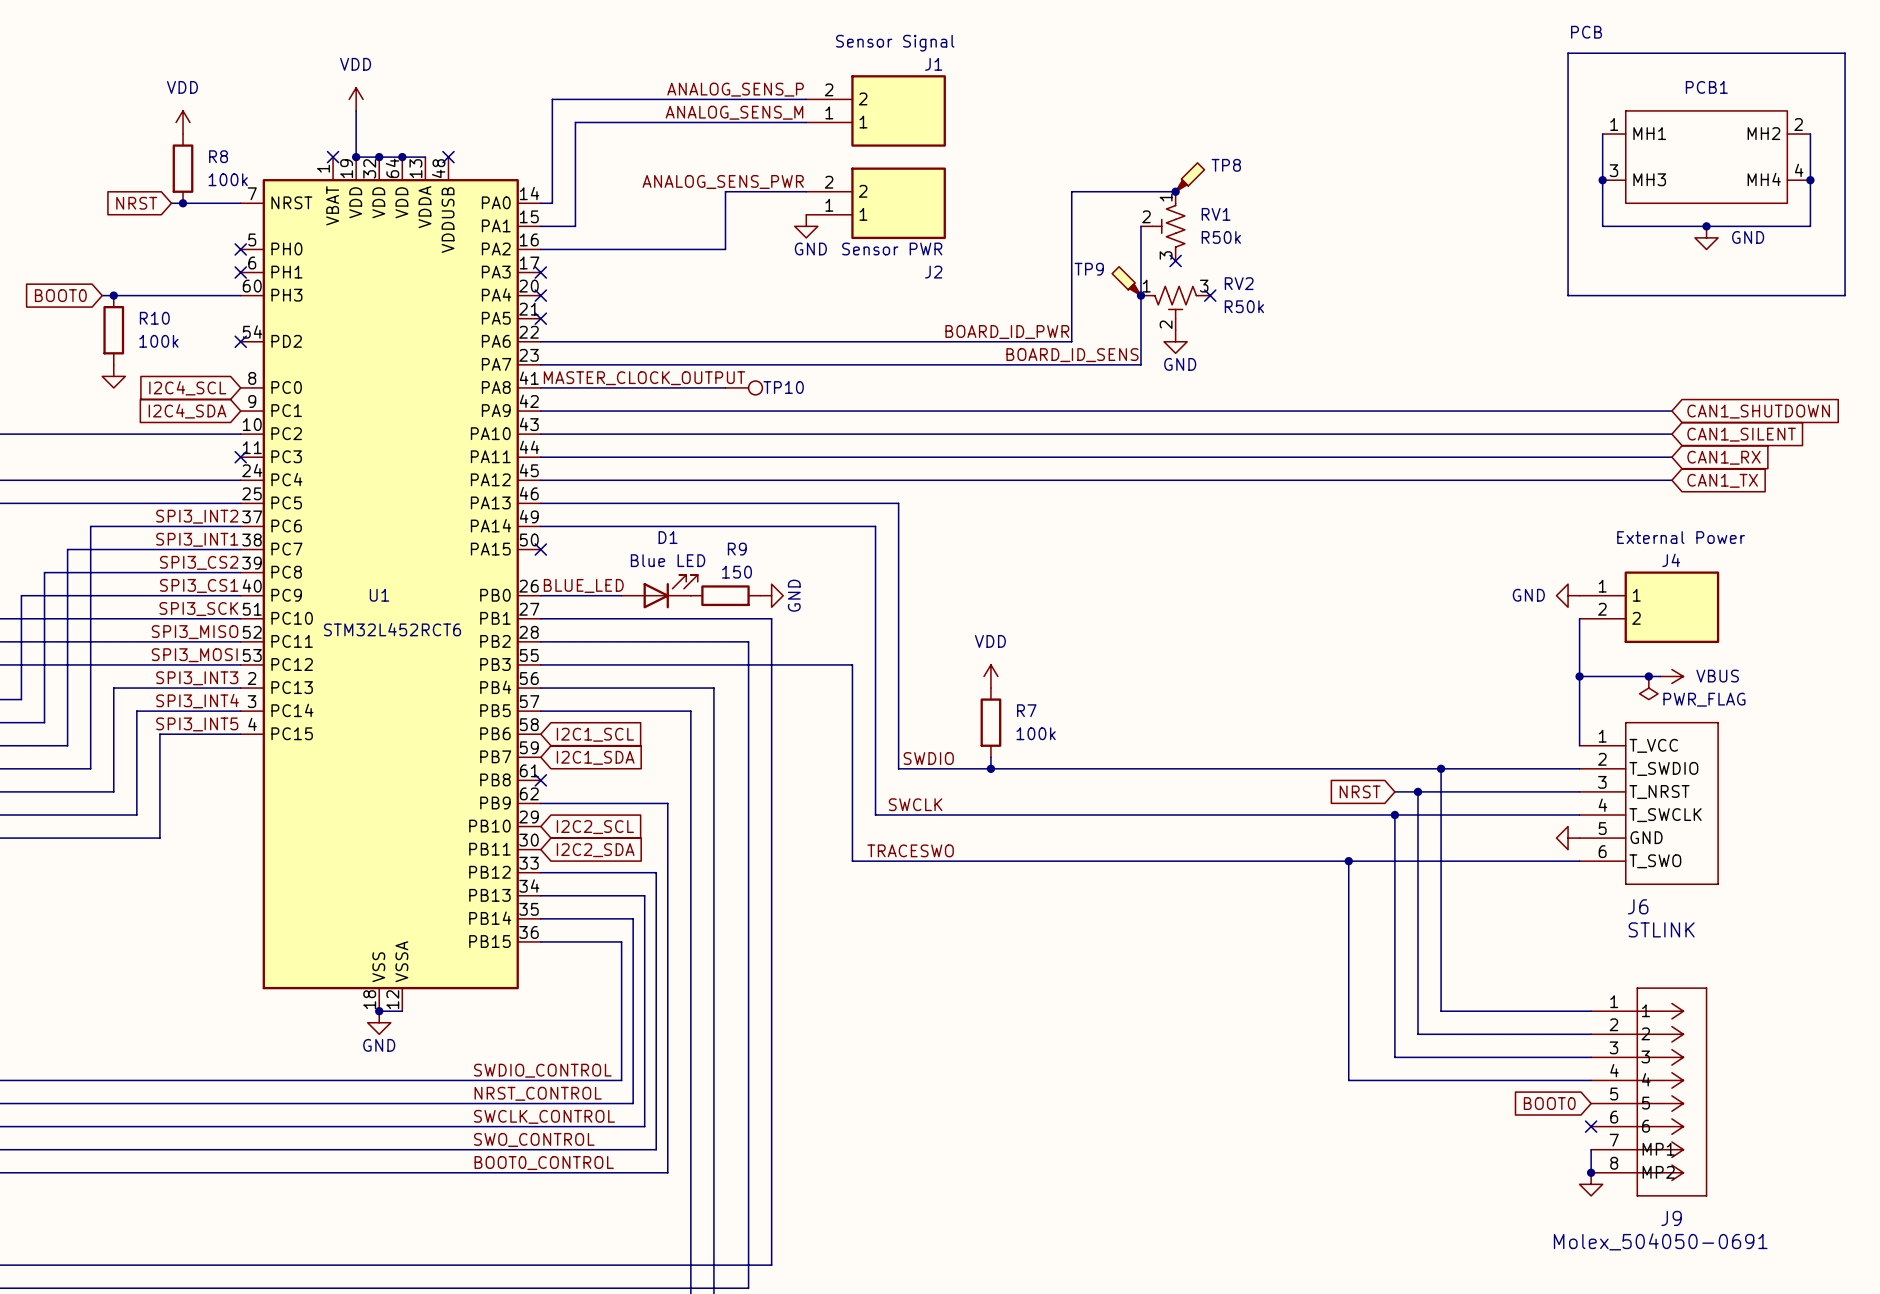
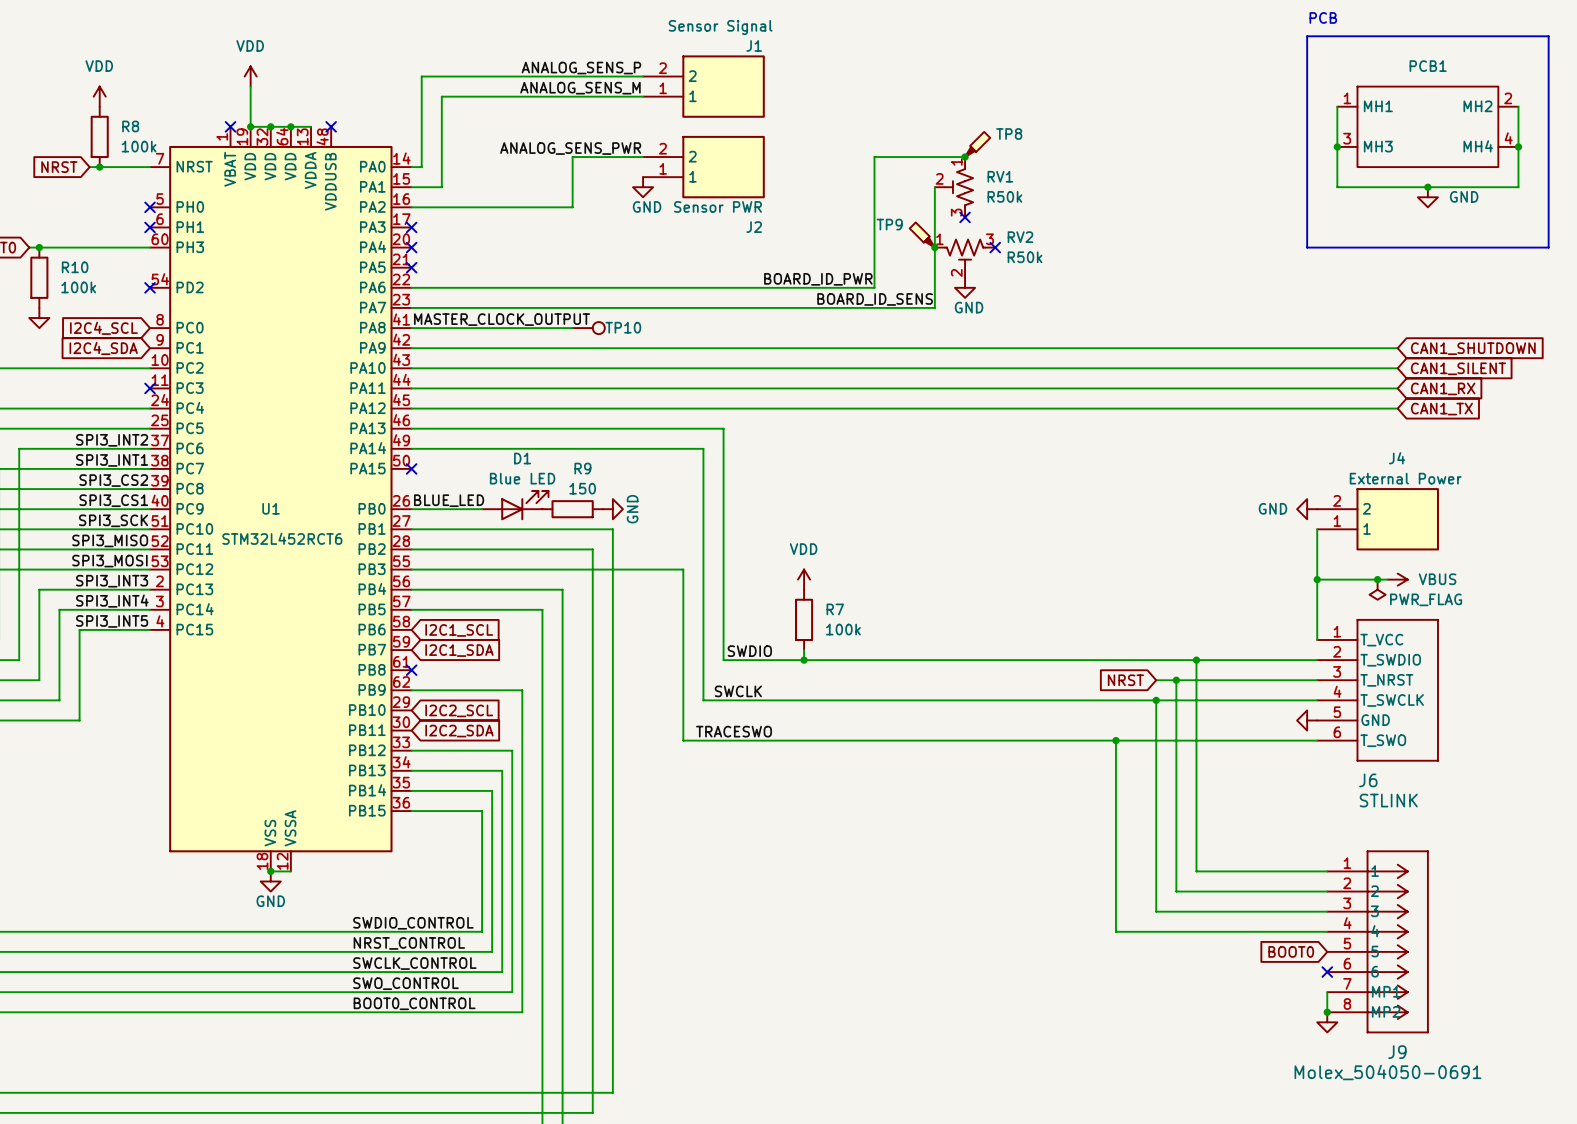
J4 value position: External Power (1681, 537) -> External Power (1405, 478)
J4 name position: J4 (1671, 560) -> J4 (1397, 458)
J4 flip: as is (1671, 607) -> up-down (1397, 519)

